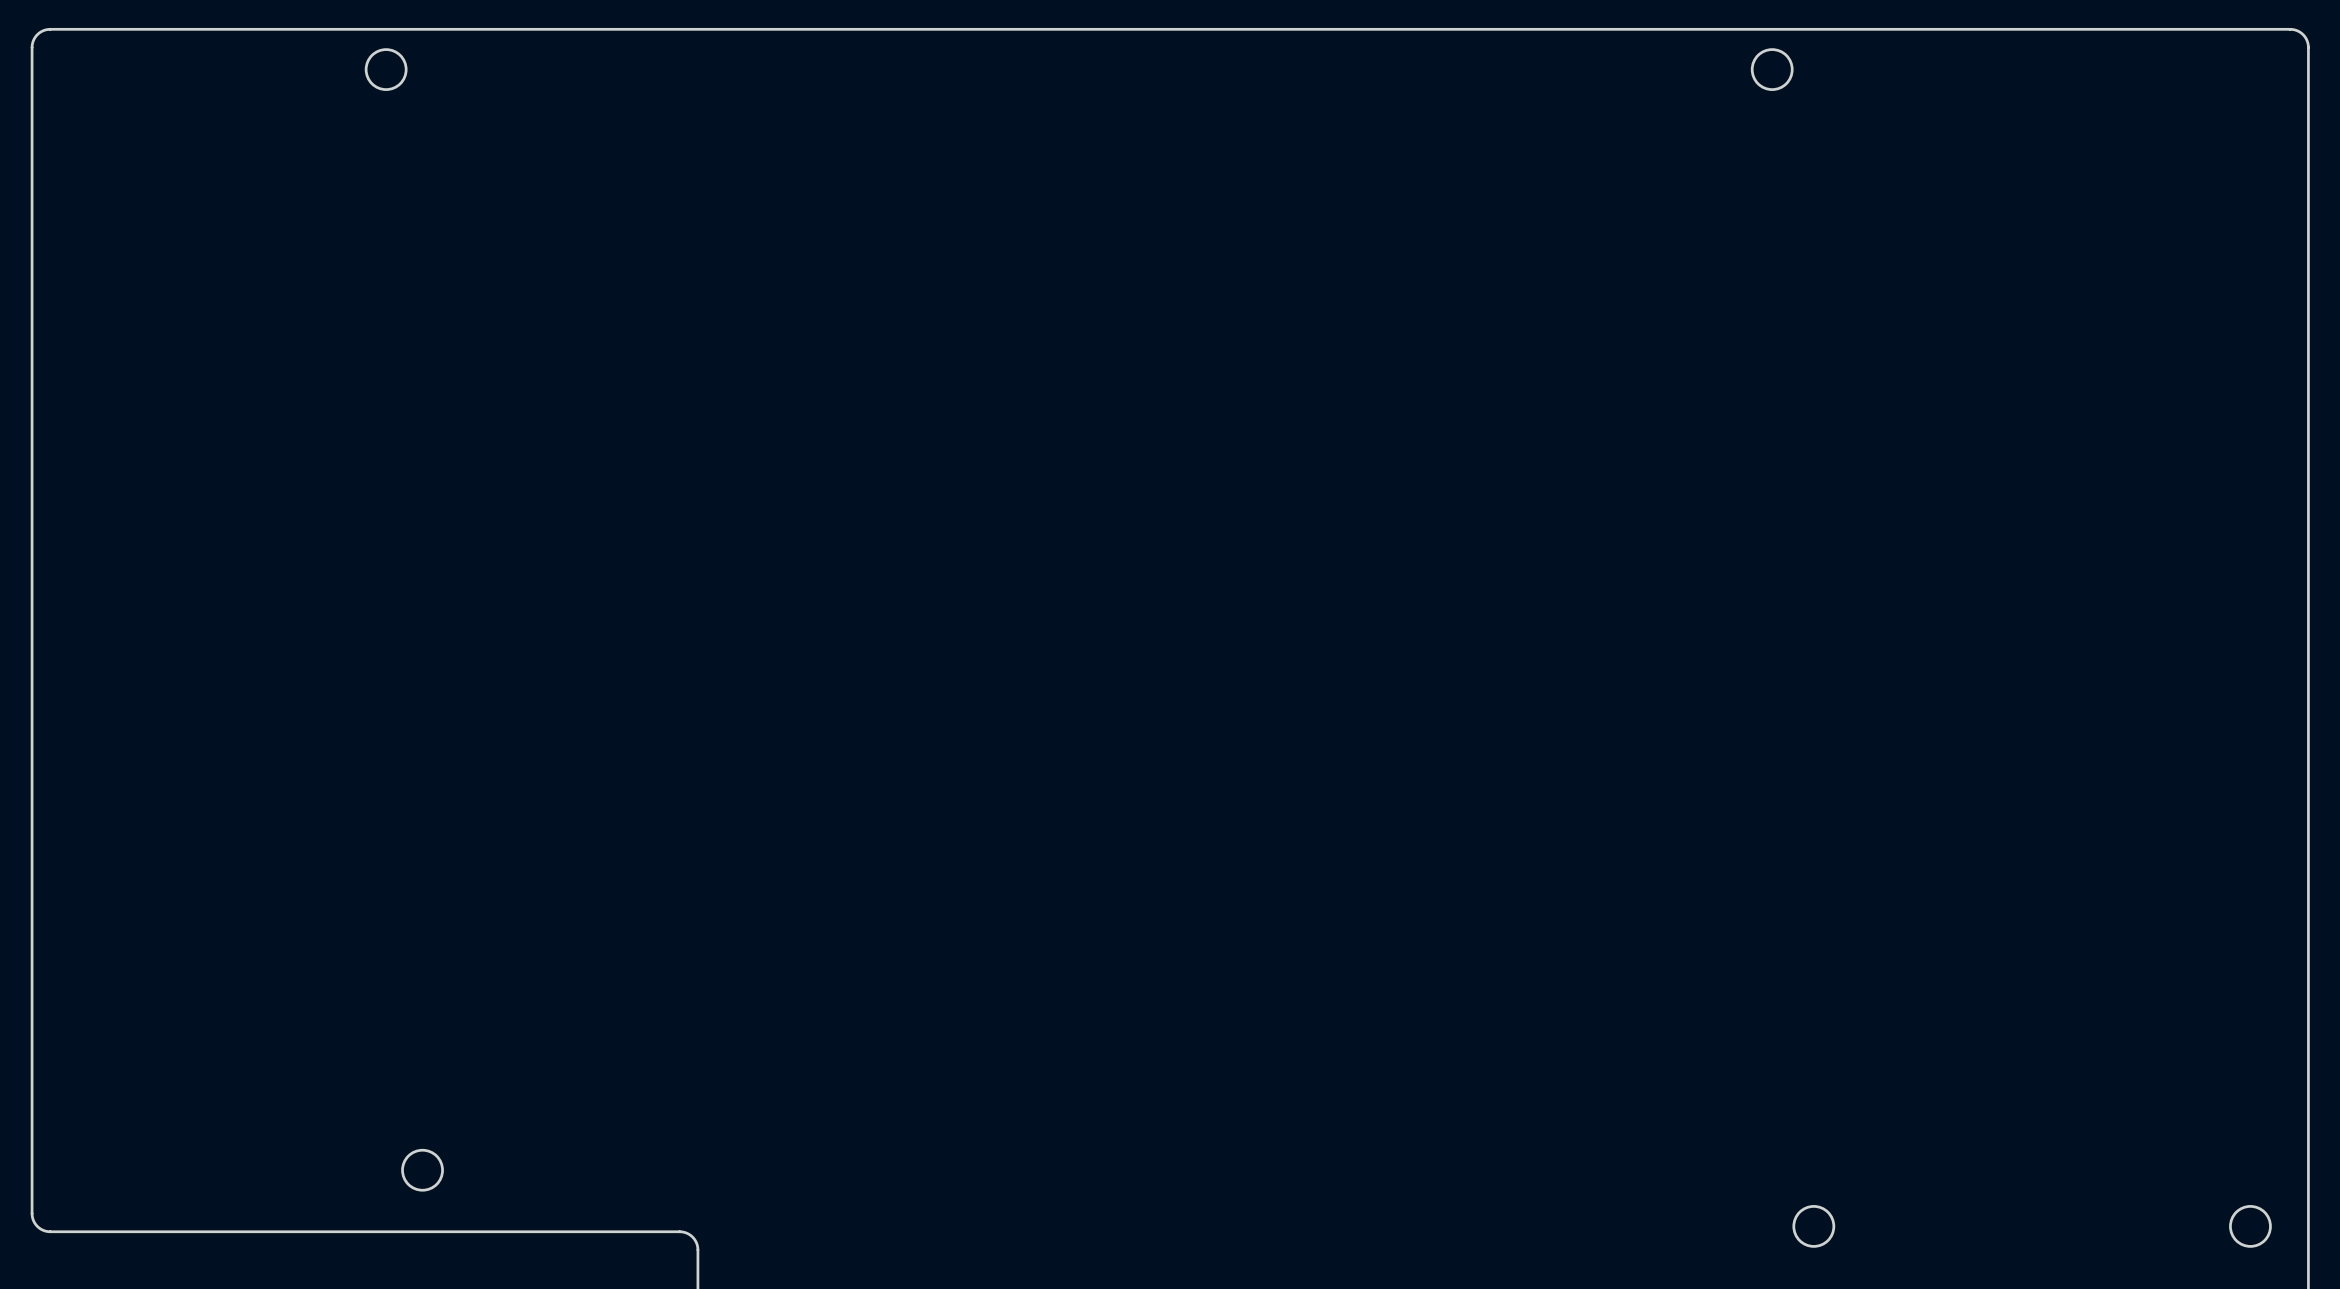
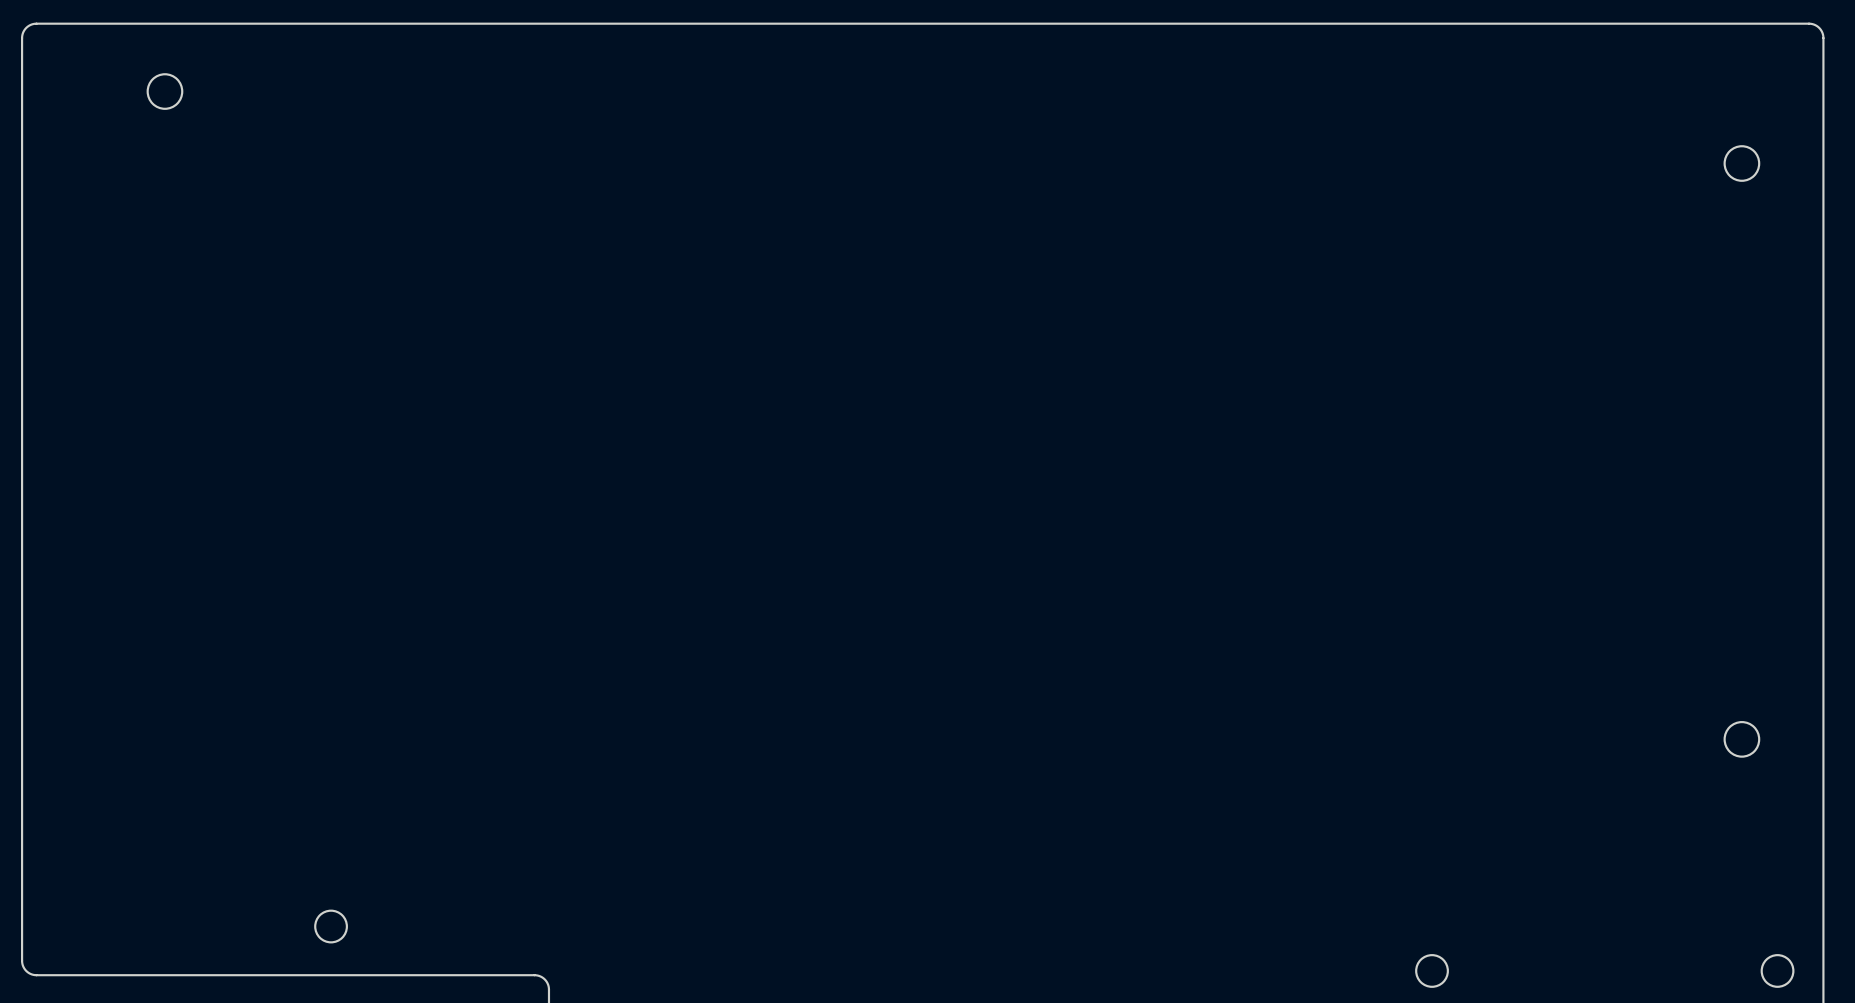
round board edge: [364, 48, 408, 91] -> none
round board edge: [1750, 48, 1794, 91] -> none
round board edge: none -> [146, 73, 184, 110]
round board edge: none -> [1723, 145, 1761, 182]
round board edge: none -> [1723, 721, 1761, 758]

